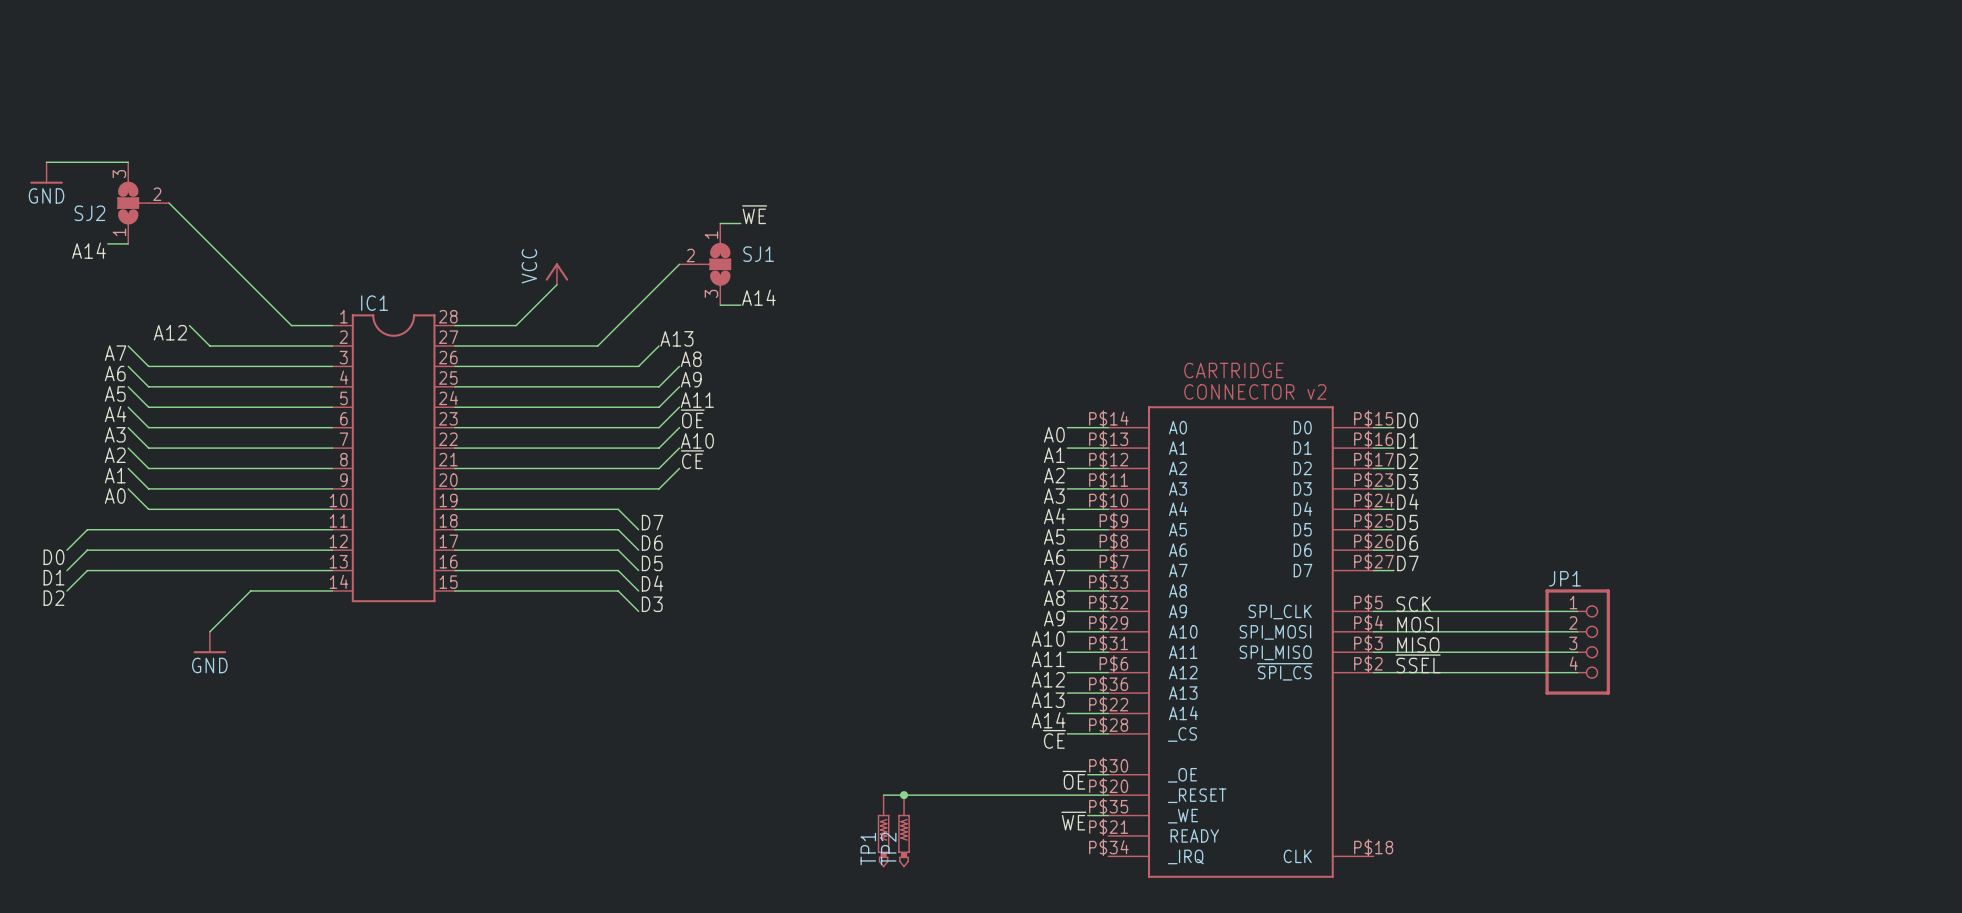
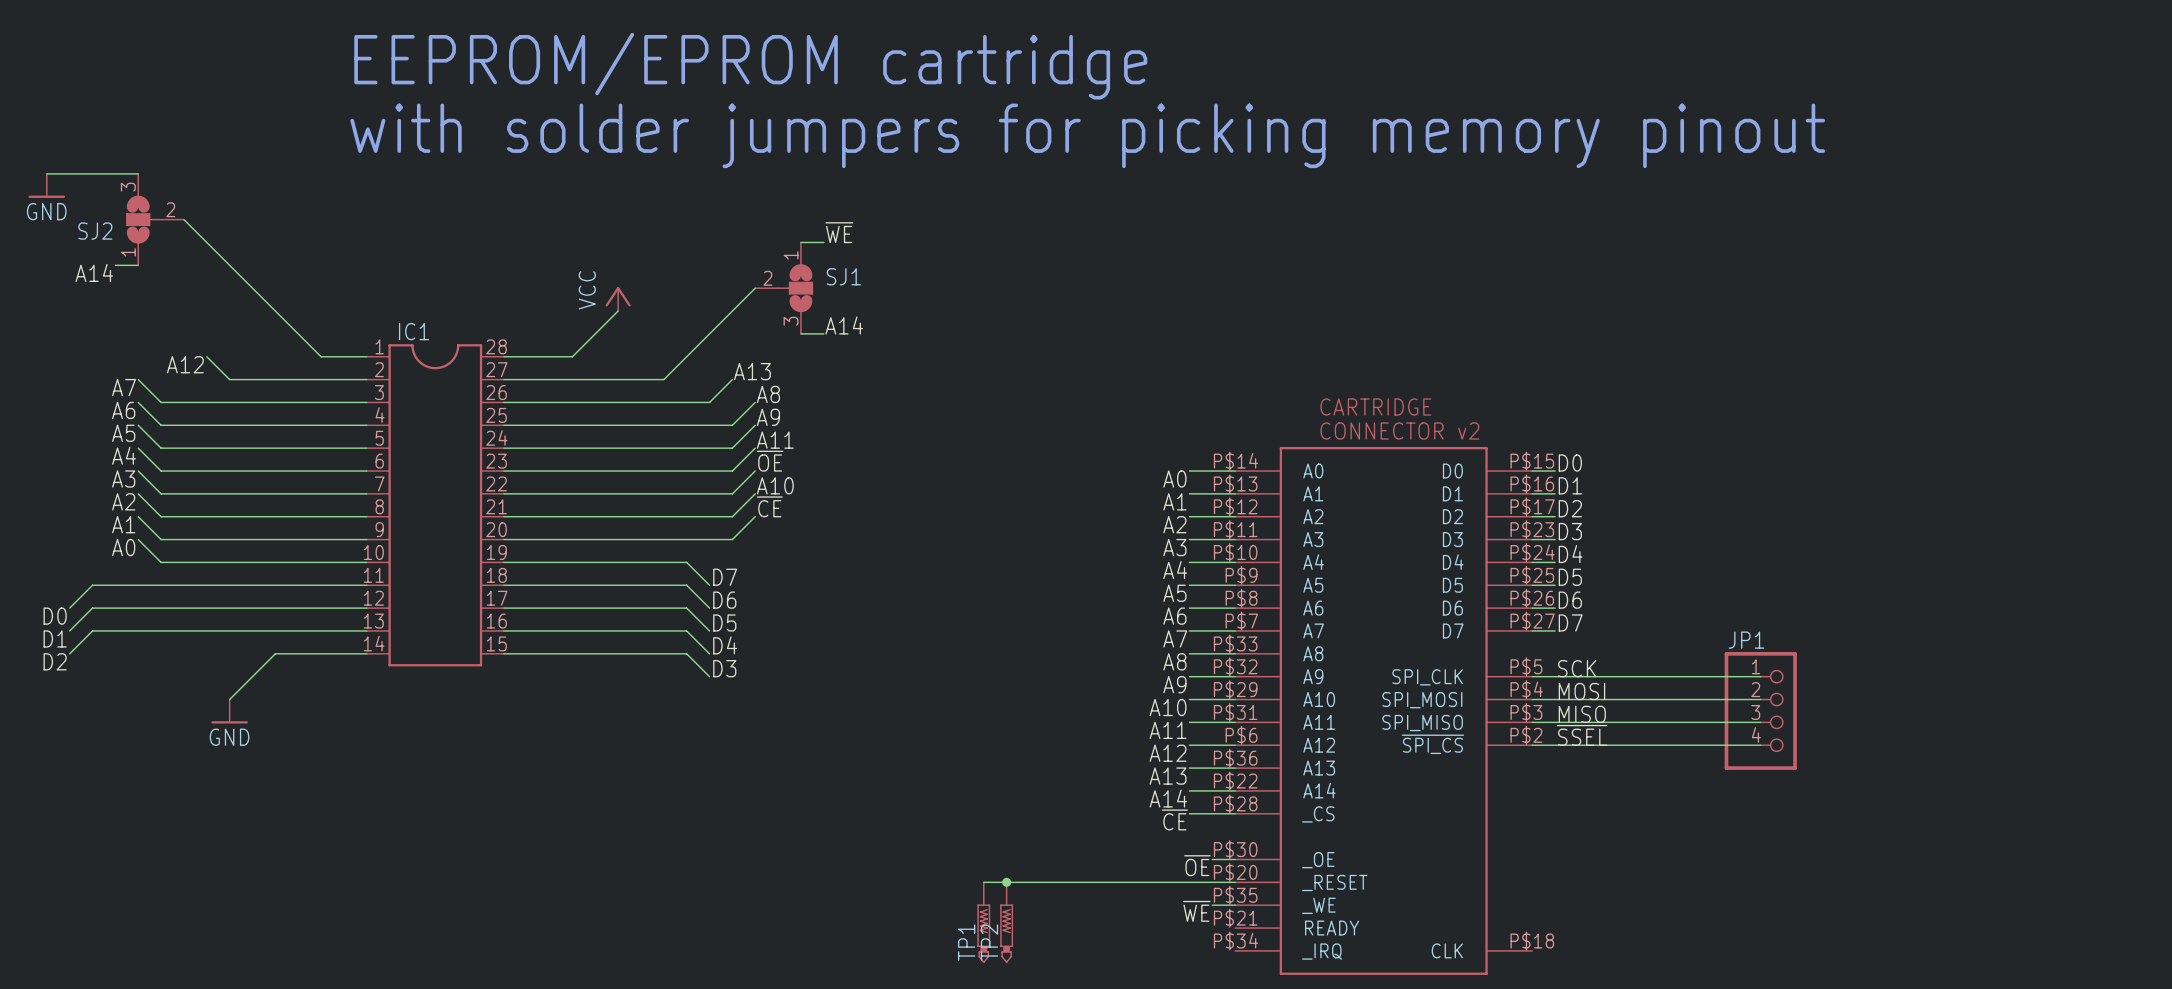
text: none -> EEPROM/EPROM cartridge (750, 66)
text: none -> with solder jumpers for picking memory pinout (1087, 135)

